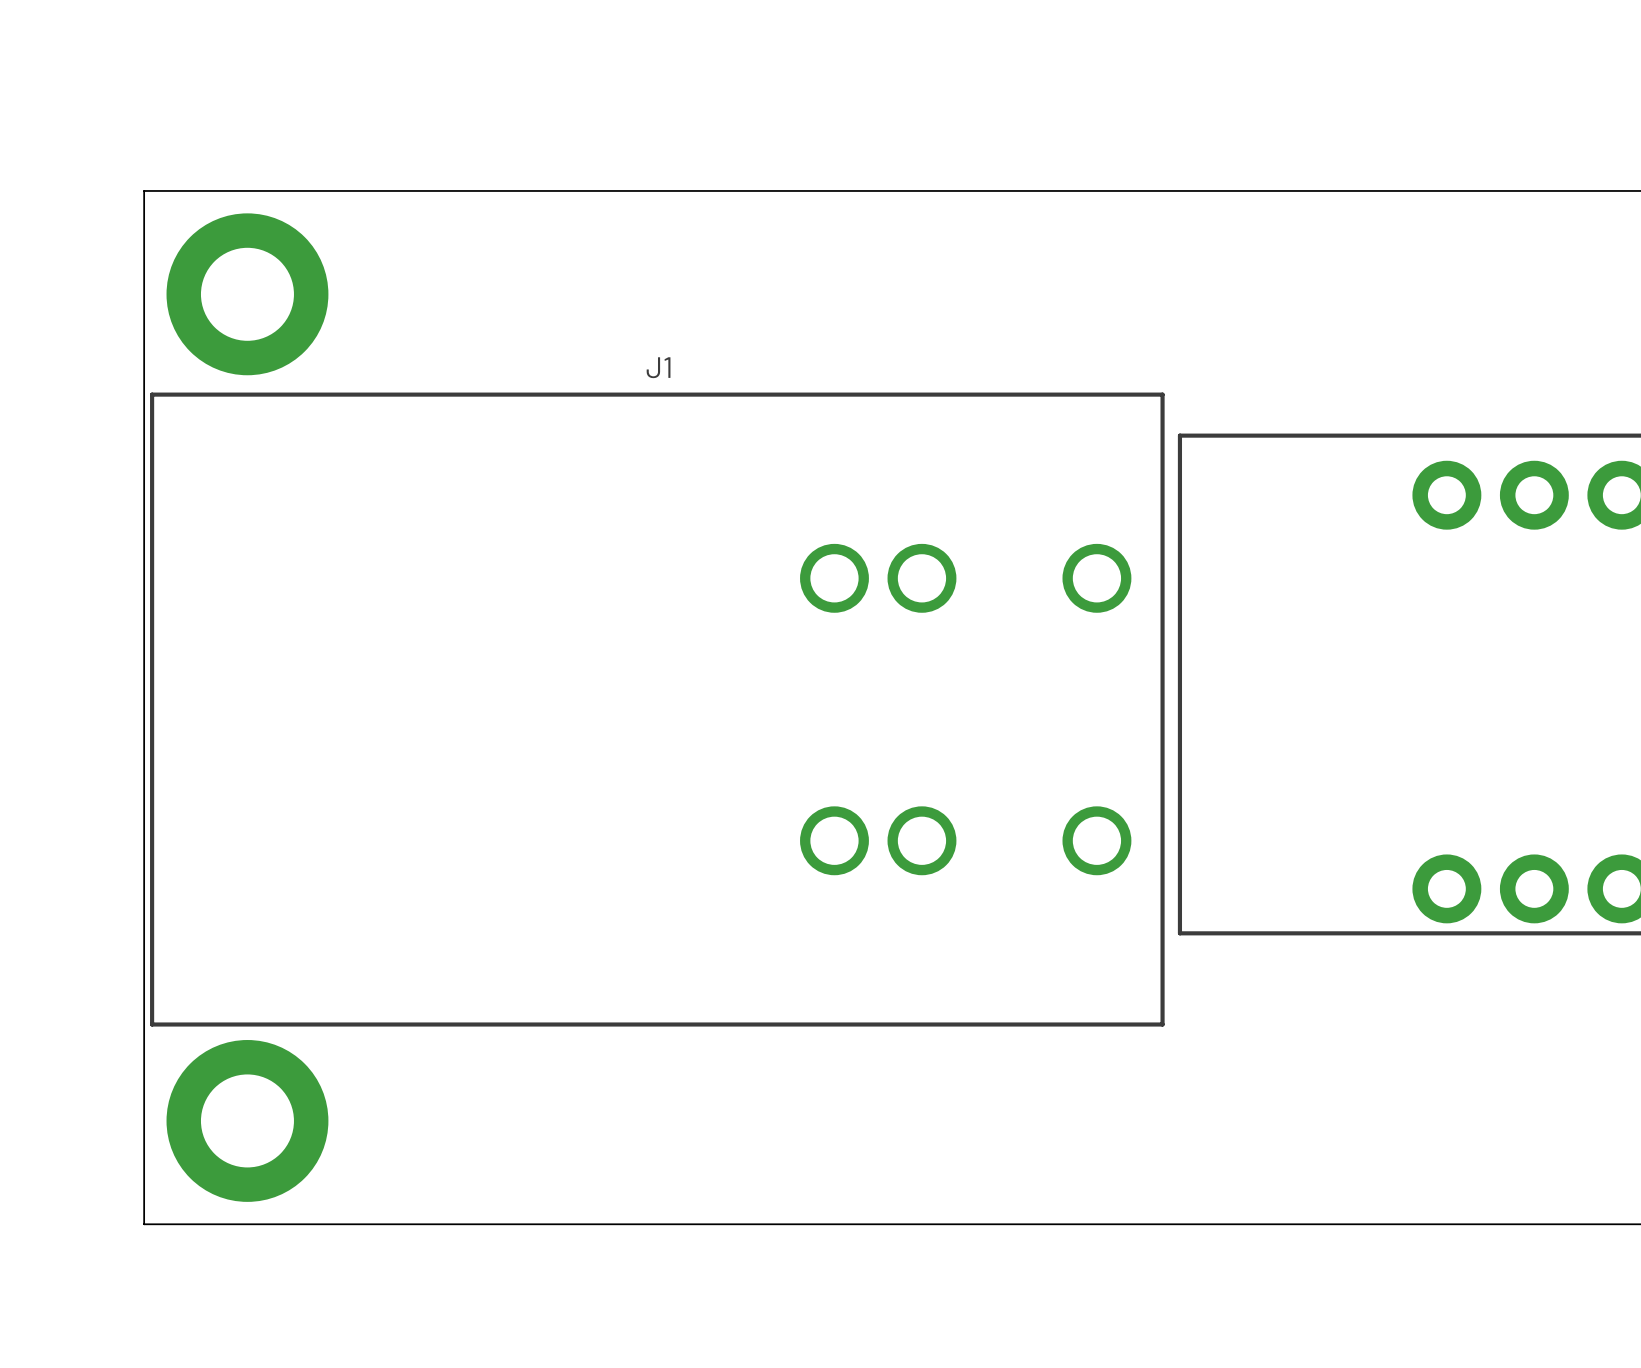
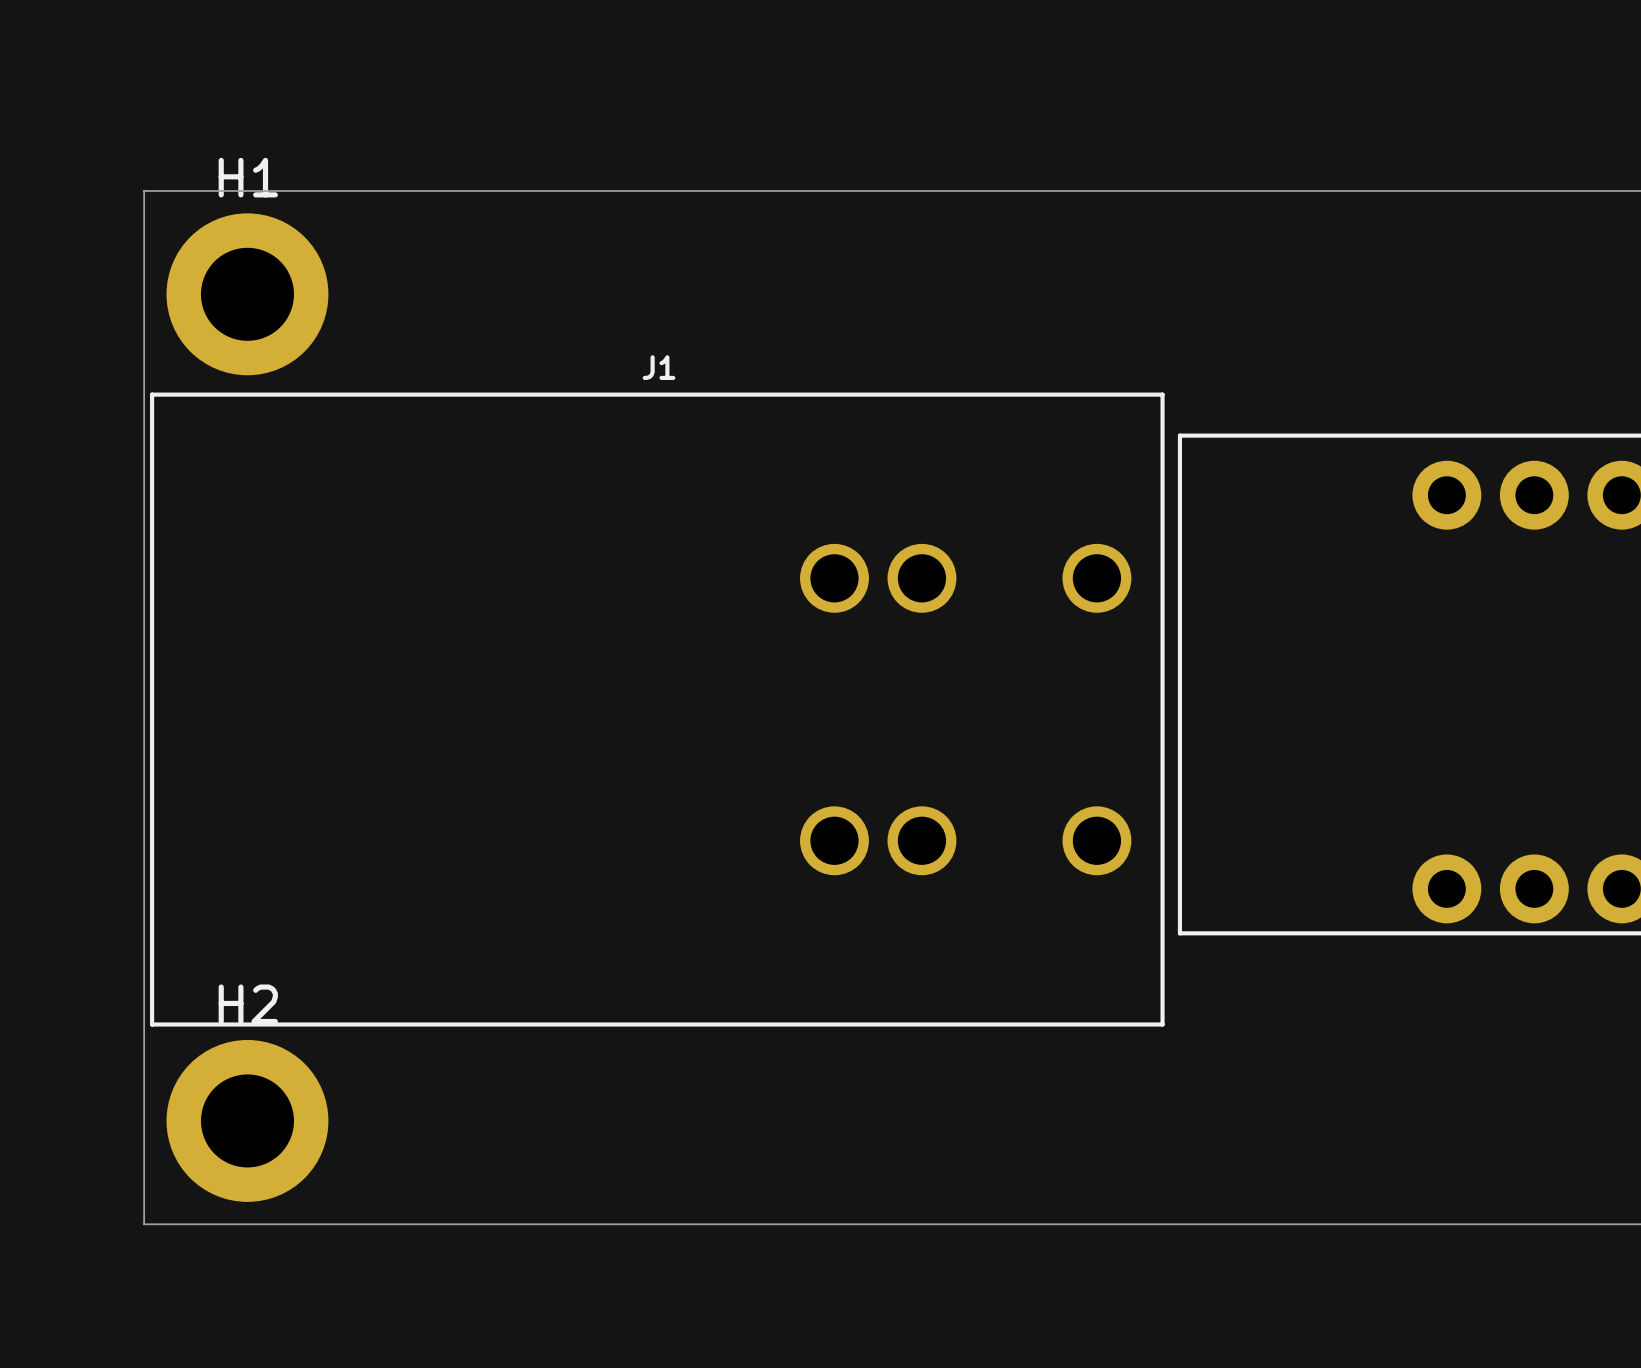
H1 name: none -> H1 (248, 177)
H2 name: none -> H2 (248, 1004)

